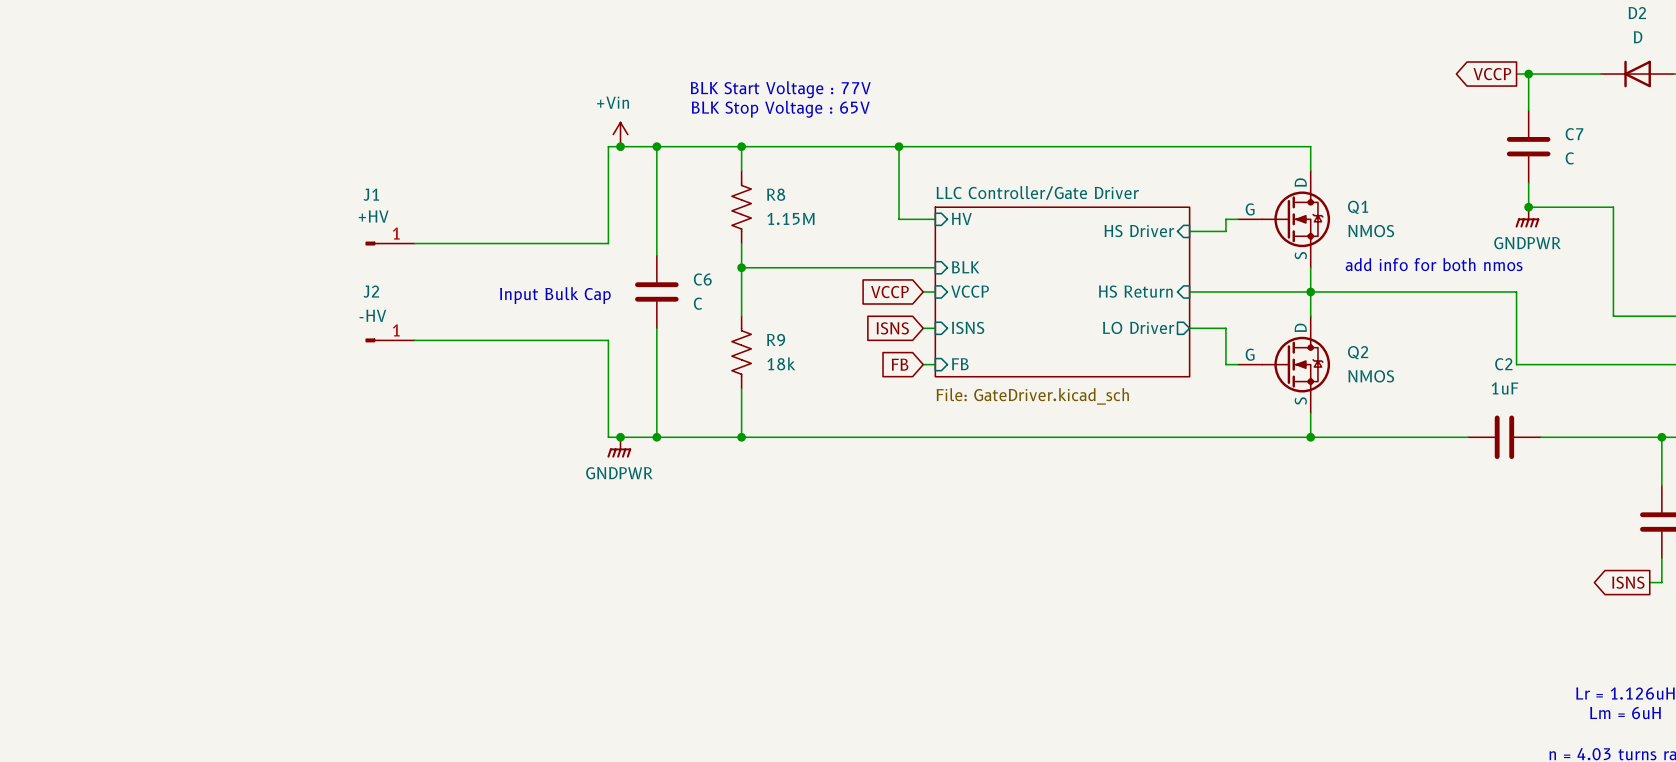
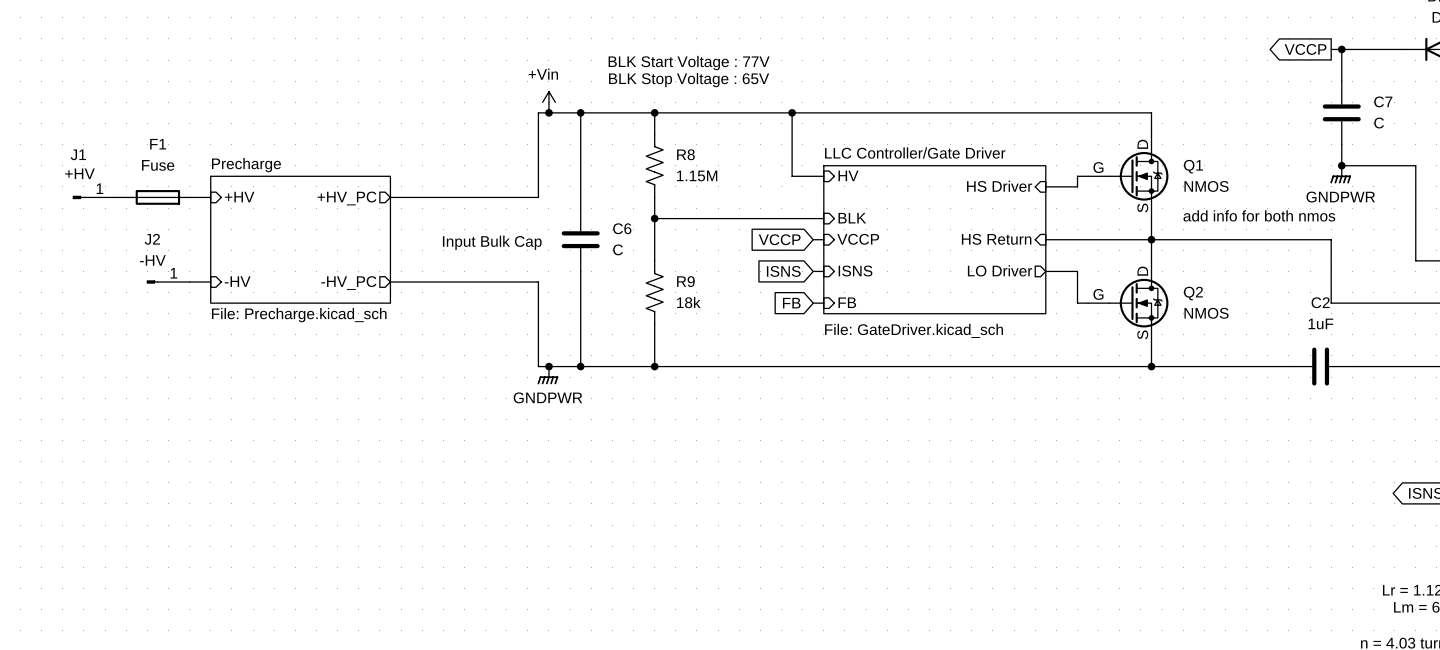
wire: none -> (115, 197) (126, 197)
F1: none -> Fuse (157, 197)
sheet pin: none -> +HV (239, 197)
J1 position: (390, 243) -> (94, 197)
wire: (414, 243) (438, 243) -> (189, 197) (210, 197)
sheet pin: none -> +HV_PC (346, 198)
sheet Precharge: none -> File: Precharge.kicad_sch (300, 239)
sheet pin: none -> -HV (237, 281)
J2 position: (390, 340) -> (168, 282)
wire: (414, 340) (438, 340) -> (189, 282) (210, 282)
sheet pin: none -> -HV_PC (348, 283)

